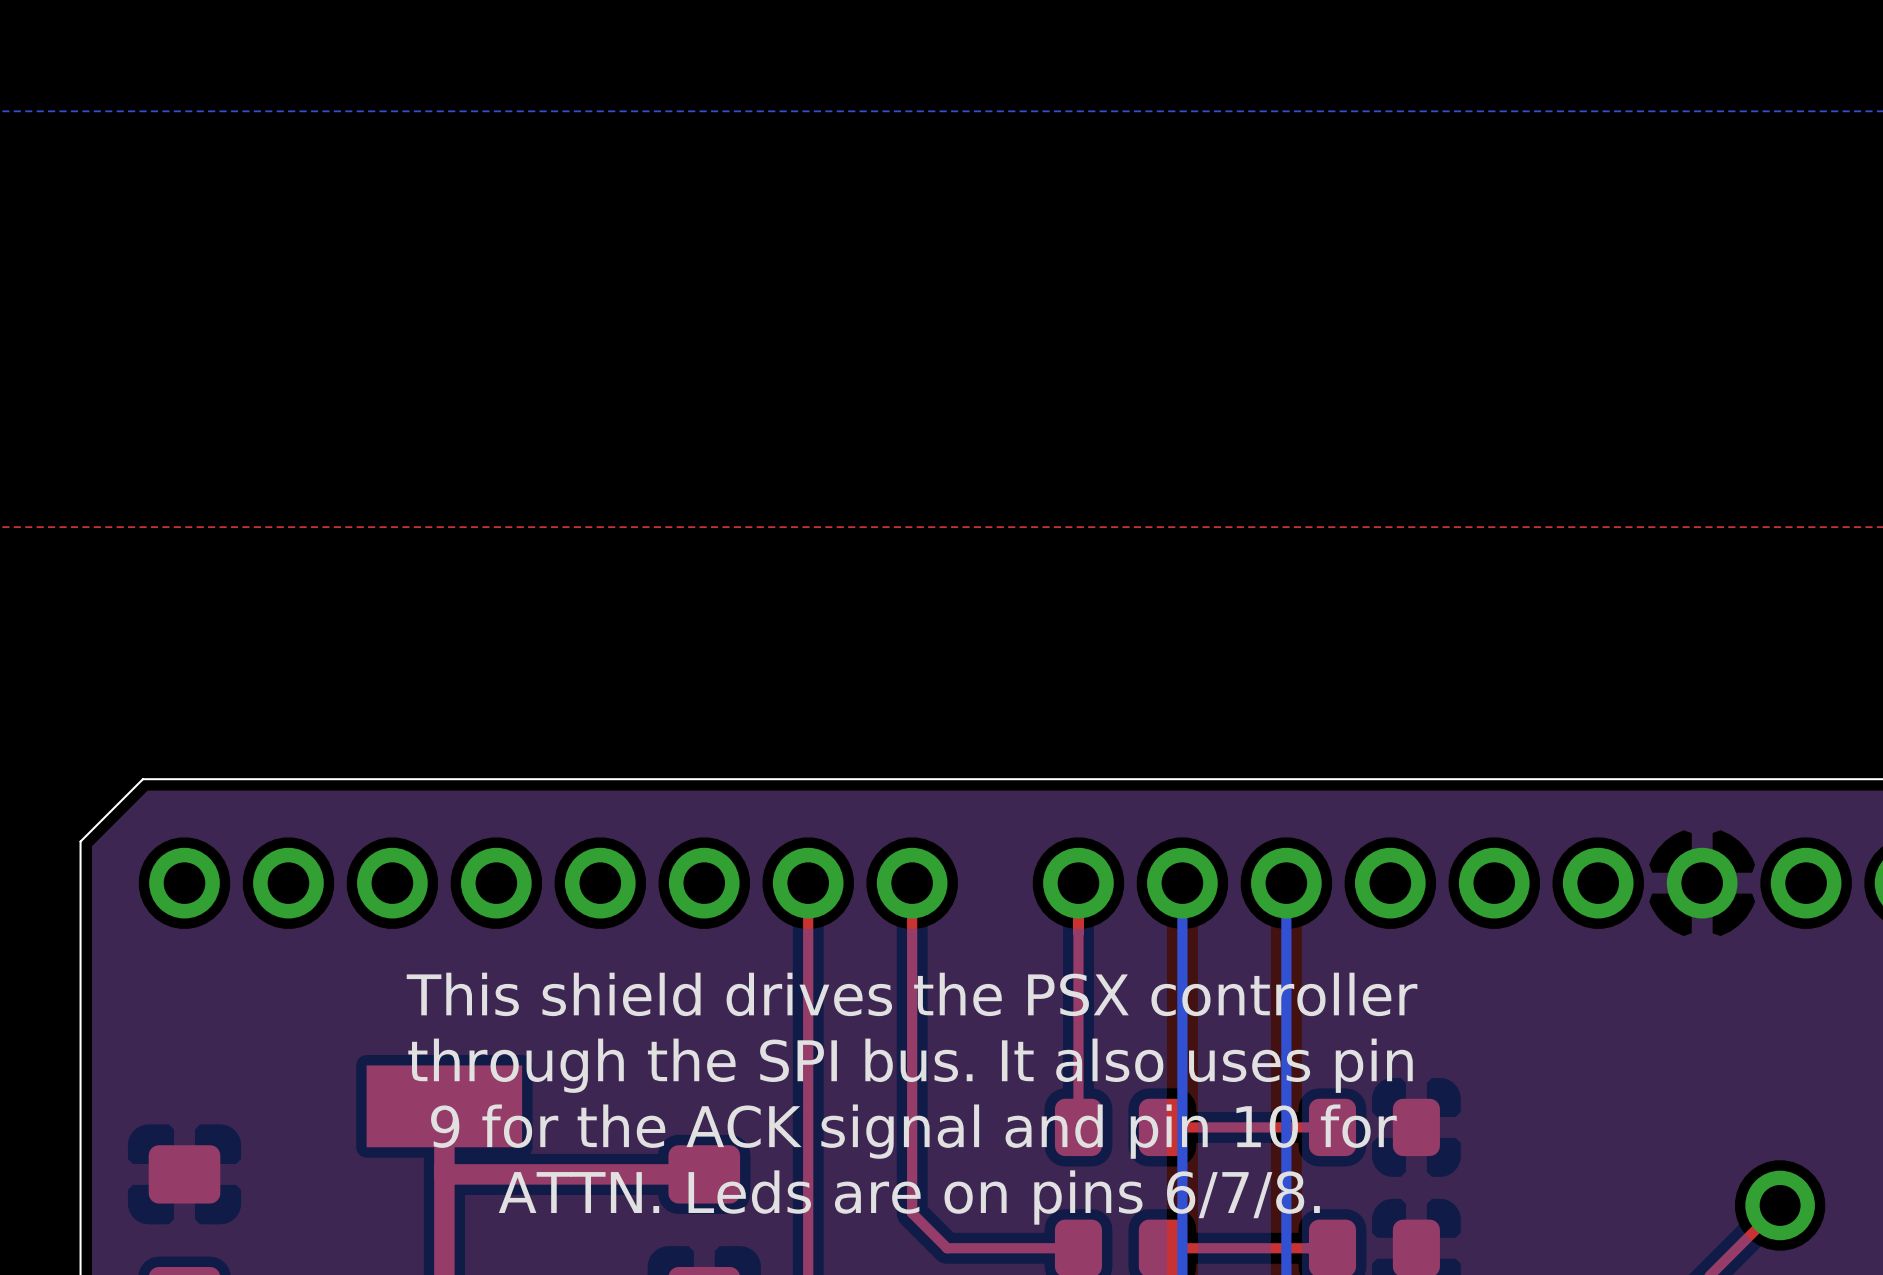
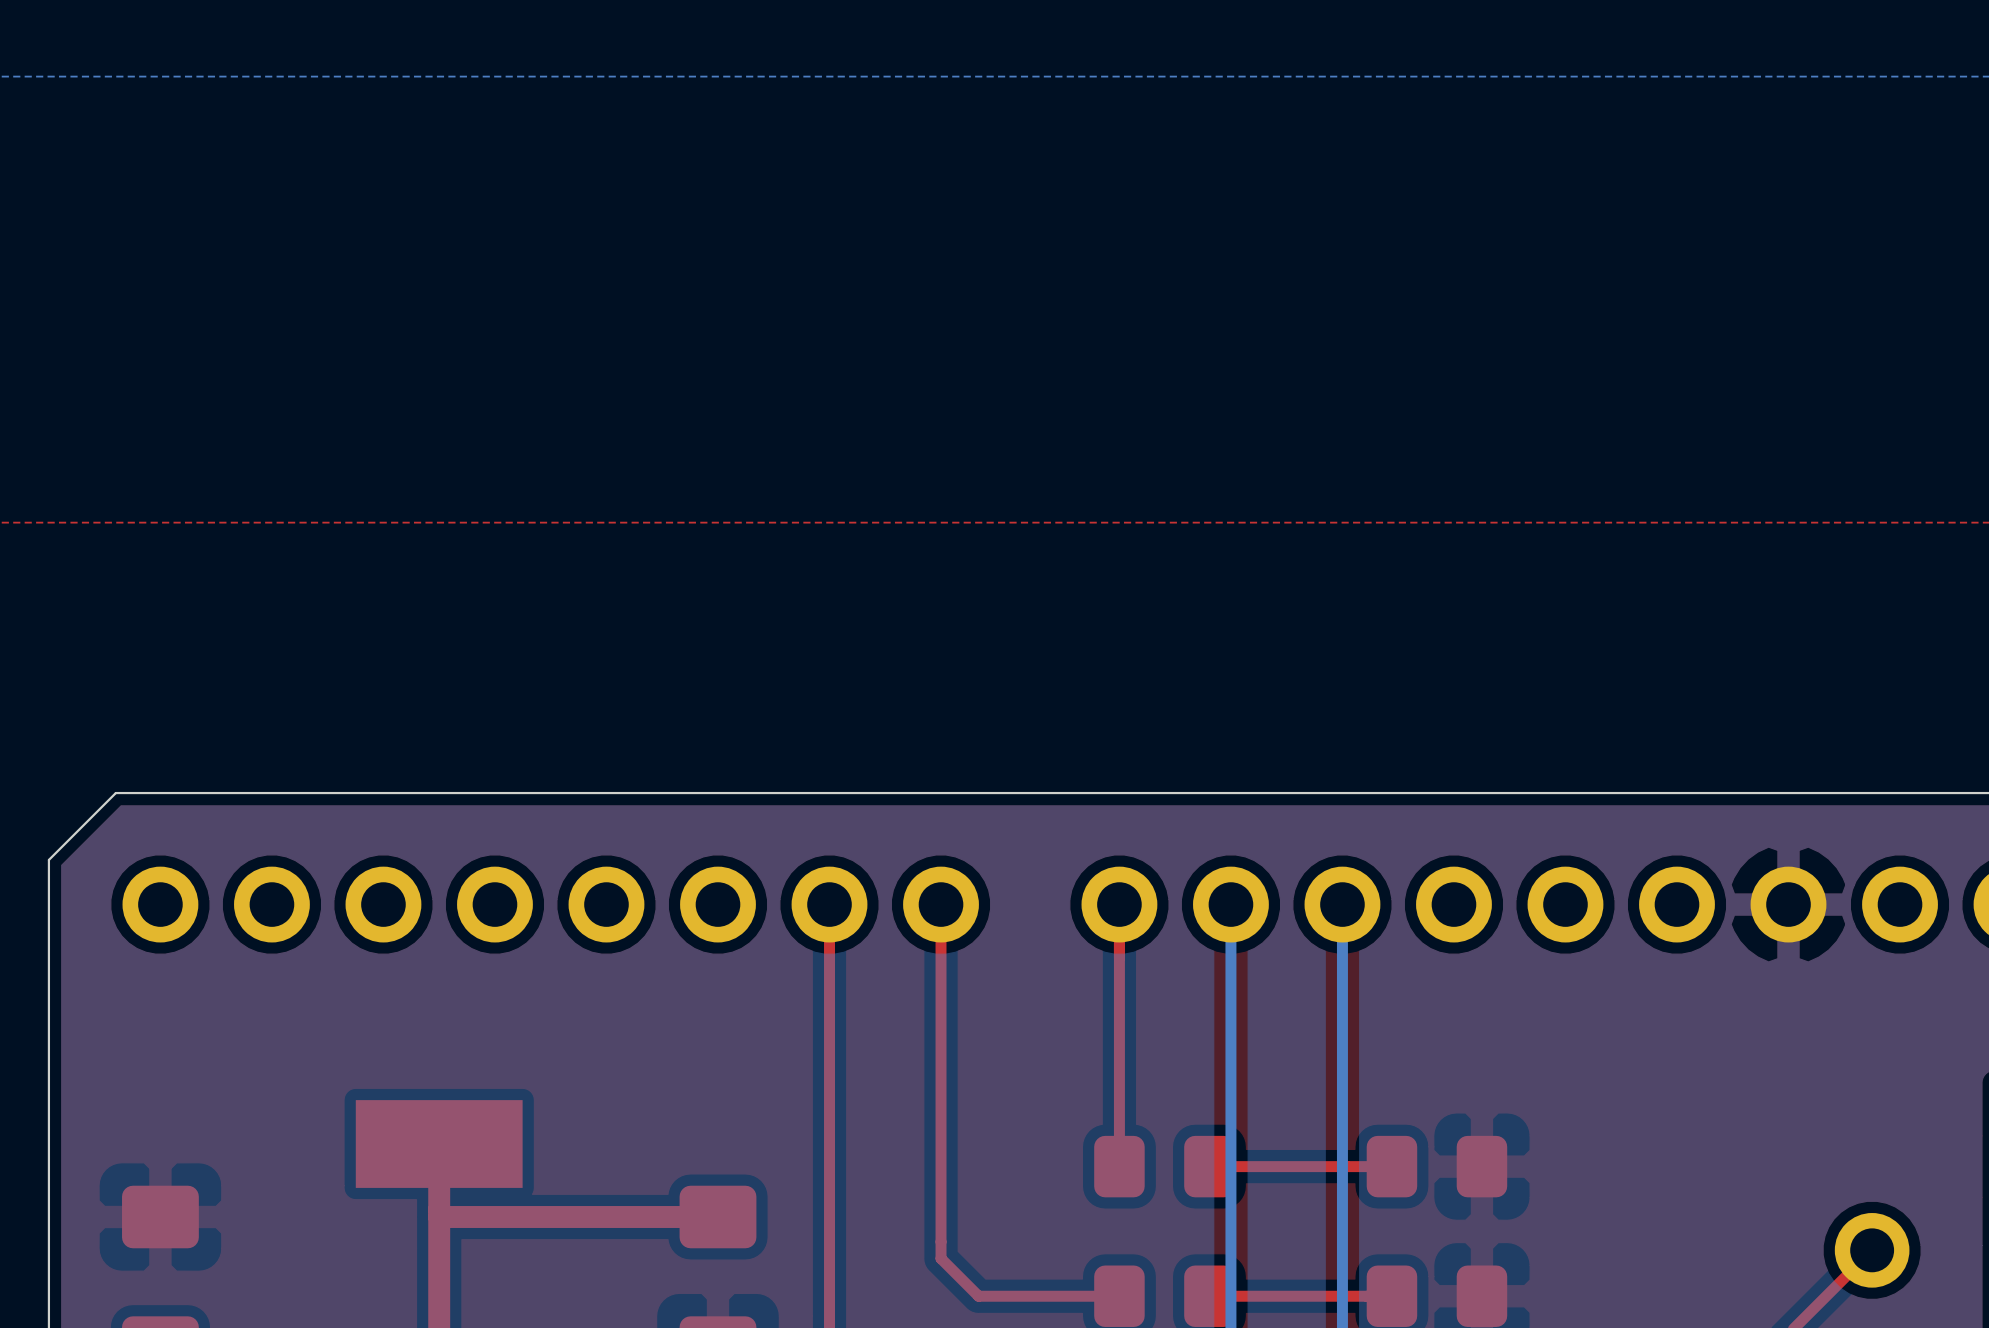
text: This shield drives the PSX controller (912, 994) -> none
text: through the SPI bus. It also uses pin (910, 1065) -> none
text: 9 for the ACK signal and pin 10 for (913, 1131) -> none
text: ATTN. Leds are on pins 6/7/8. (909, 1197) -> none

